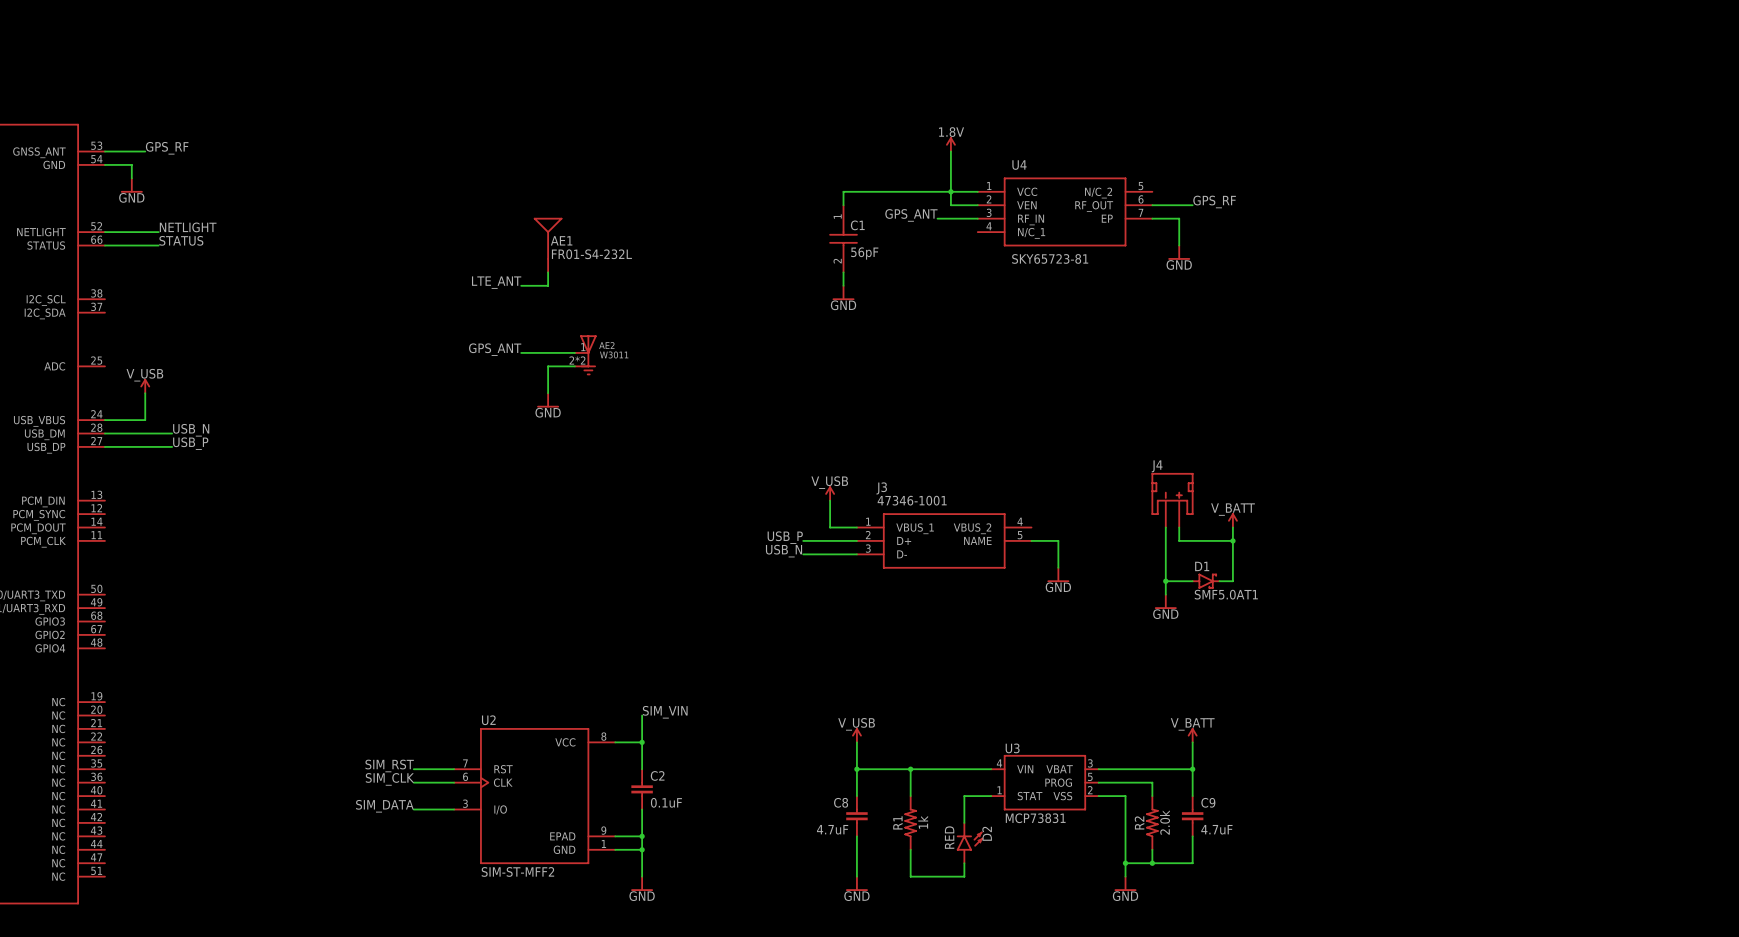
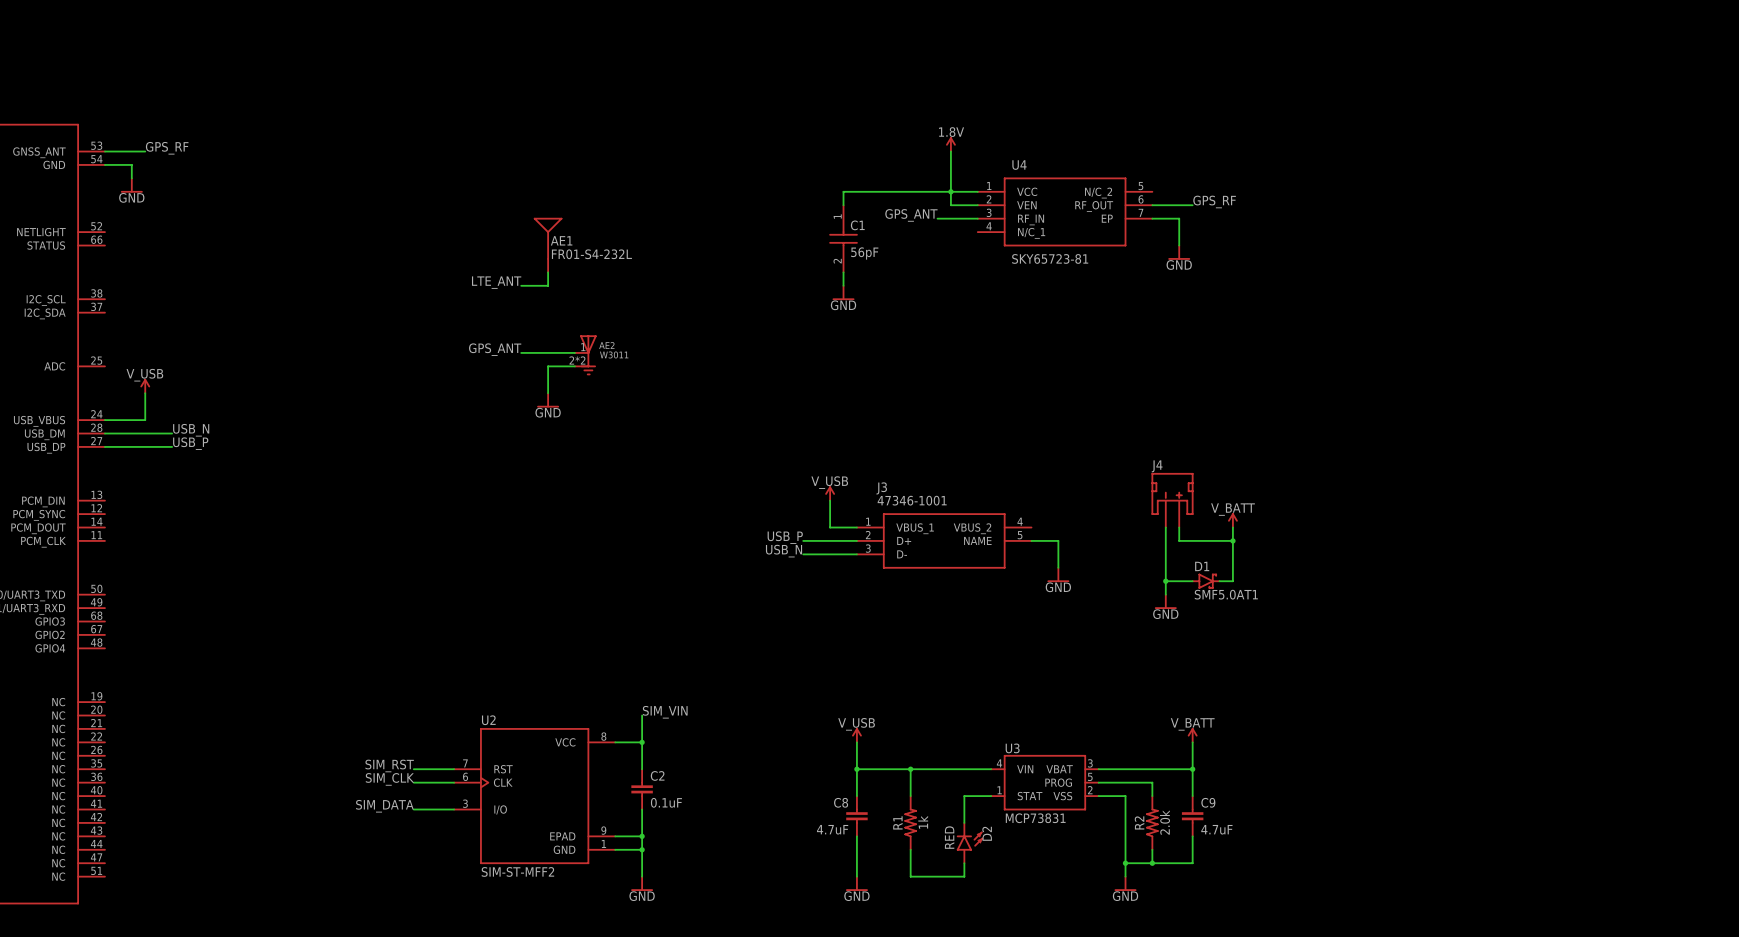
label: NETLIGHT (188, 227) -> none
wire: (104, 232) (158, 232) -> none
label: STATUS (181, 240) -> none
wire: (104, 245) (158, 245) -> none

